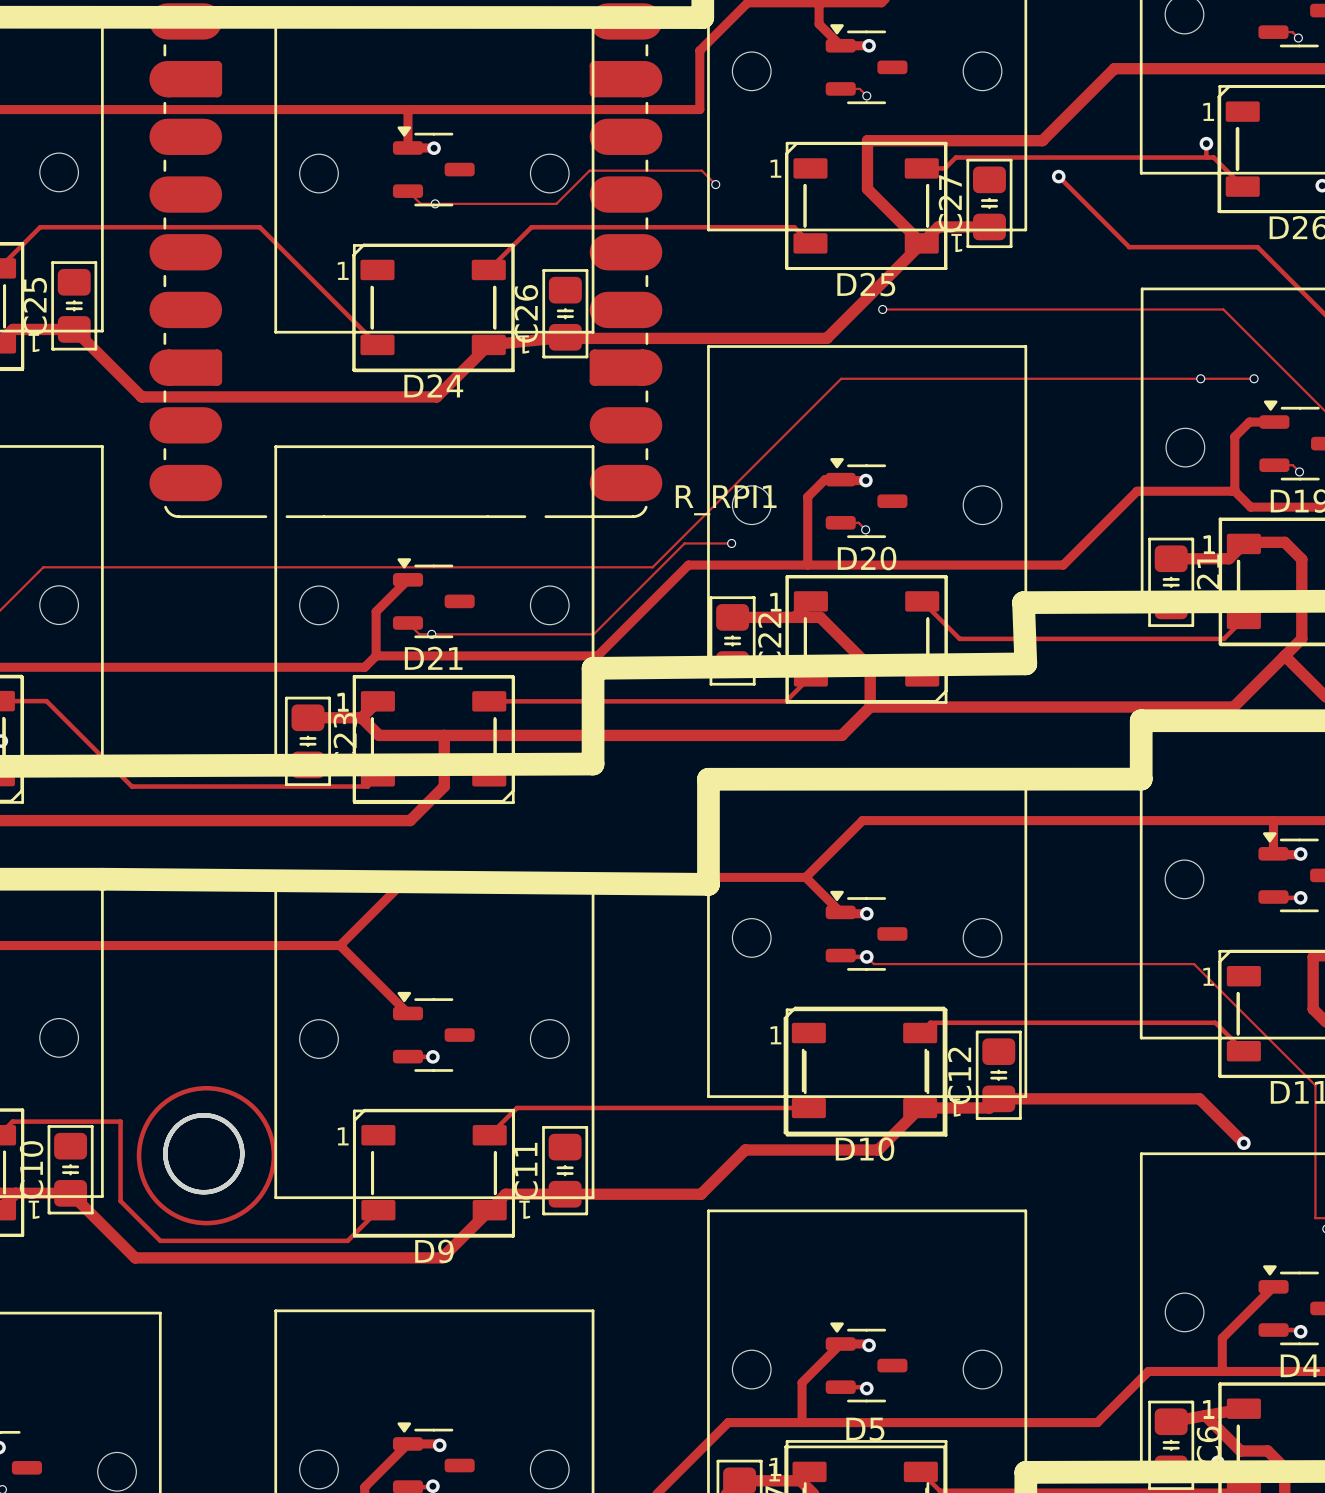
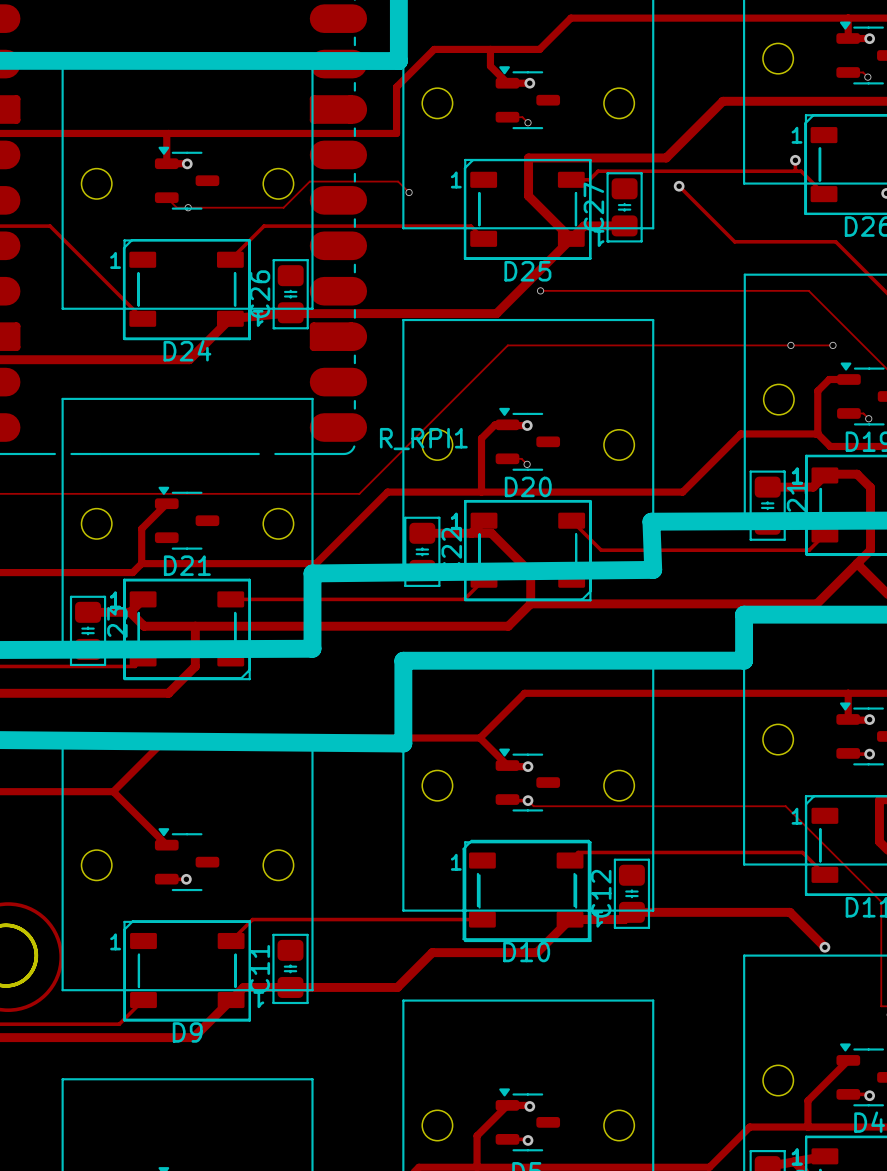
track: (731, 543) (684, 543) (593, 634) (419, 634) (407, 622) -> none
via: (731, 543) -> none
via: (431, 634) -> none

